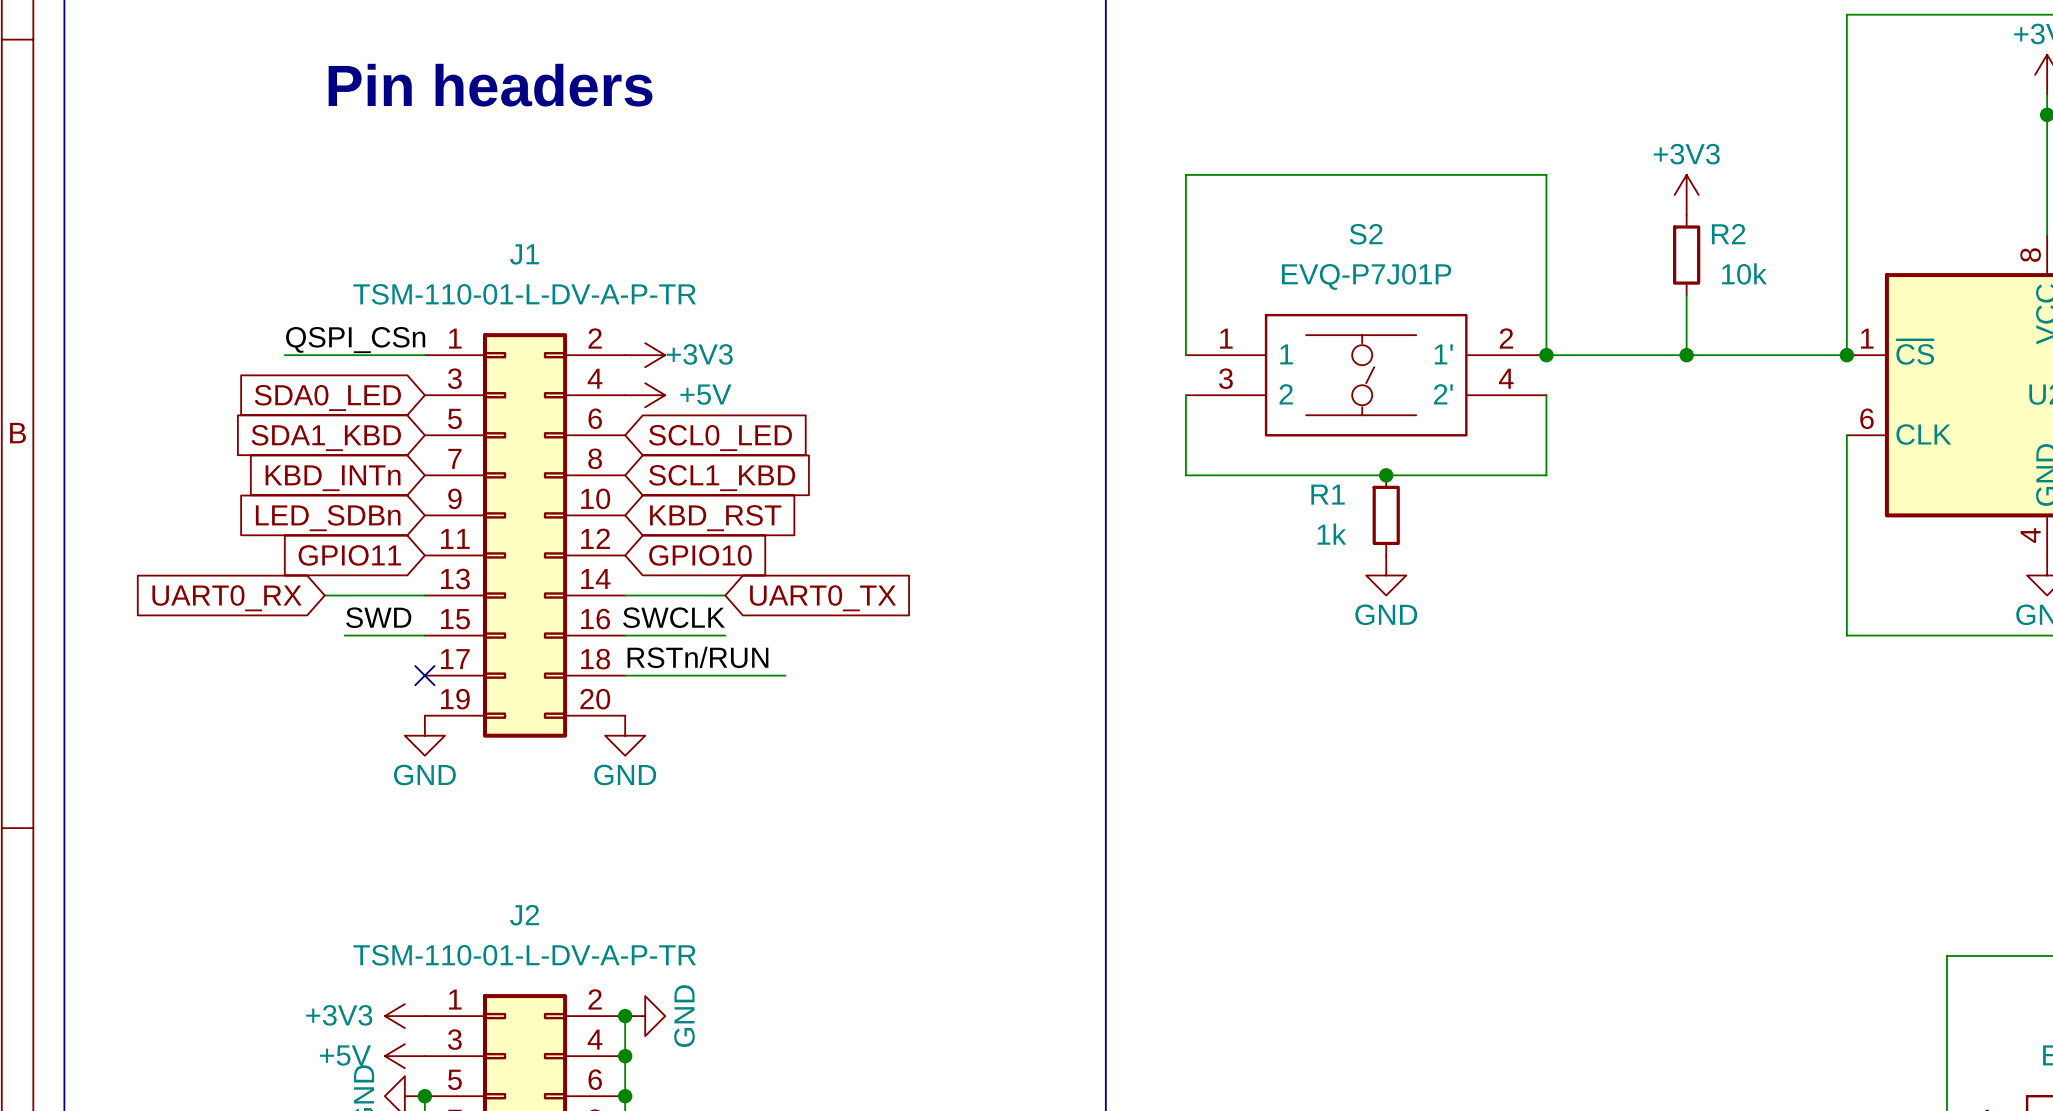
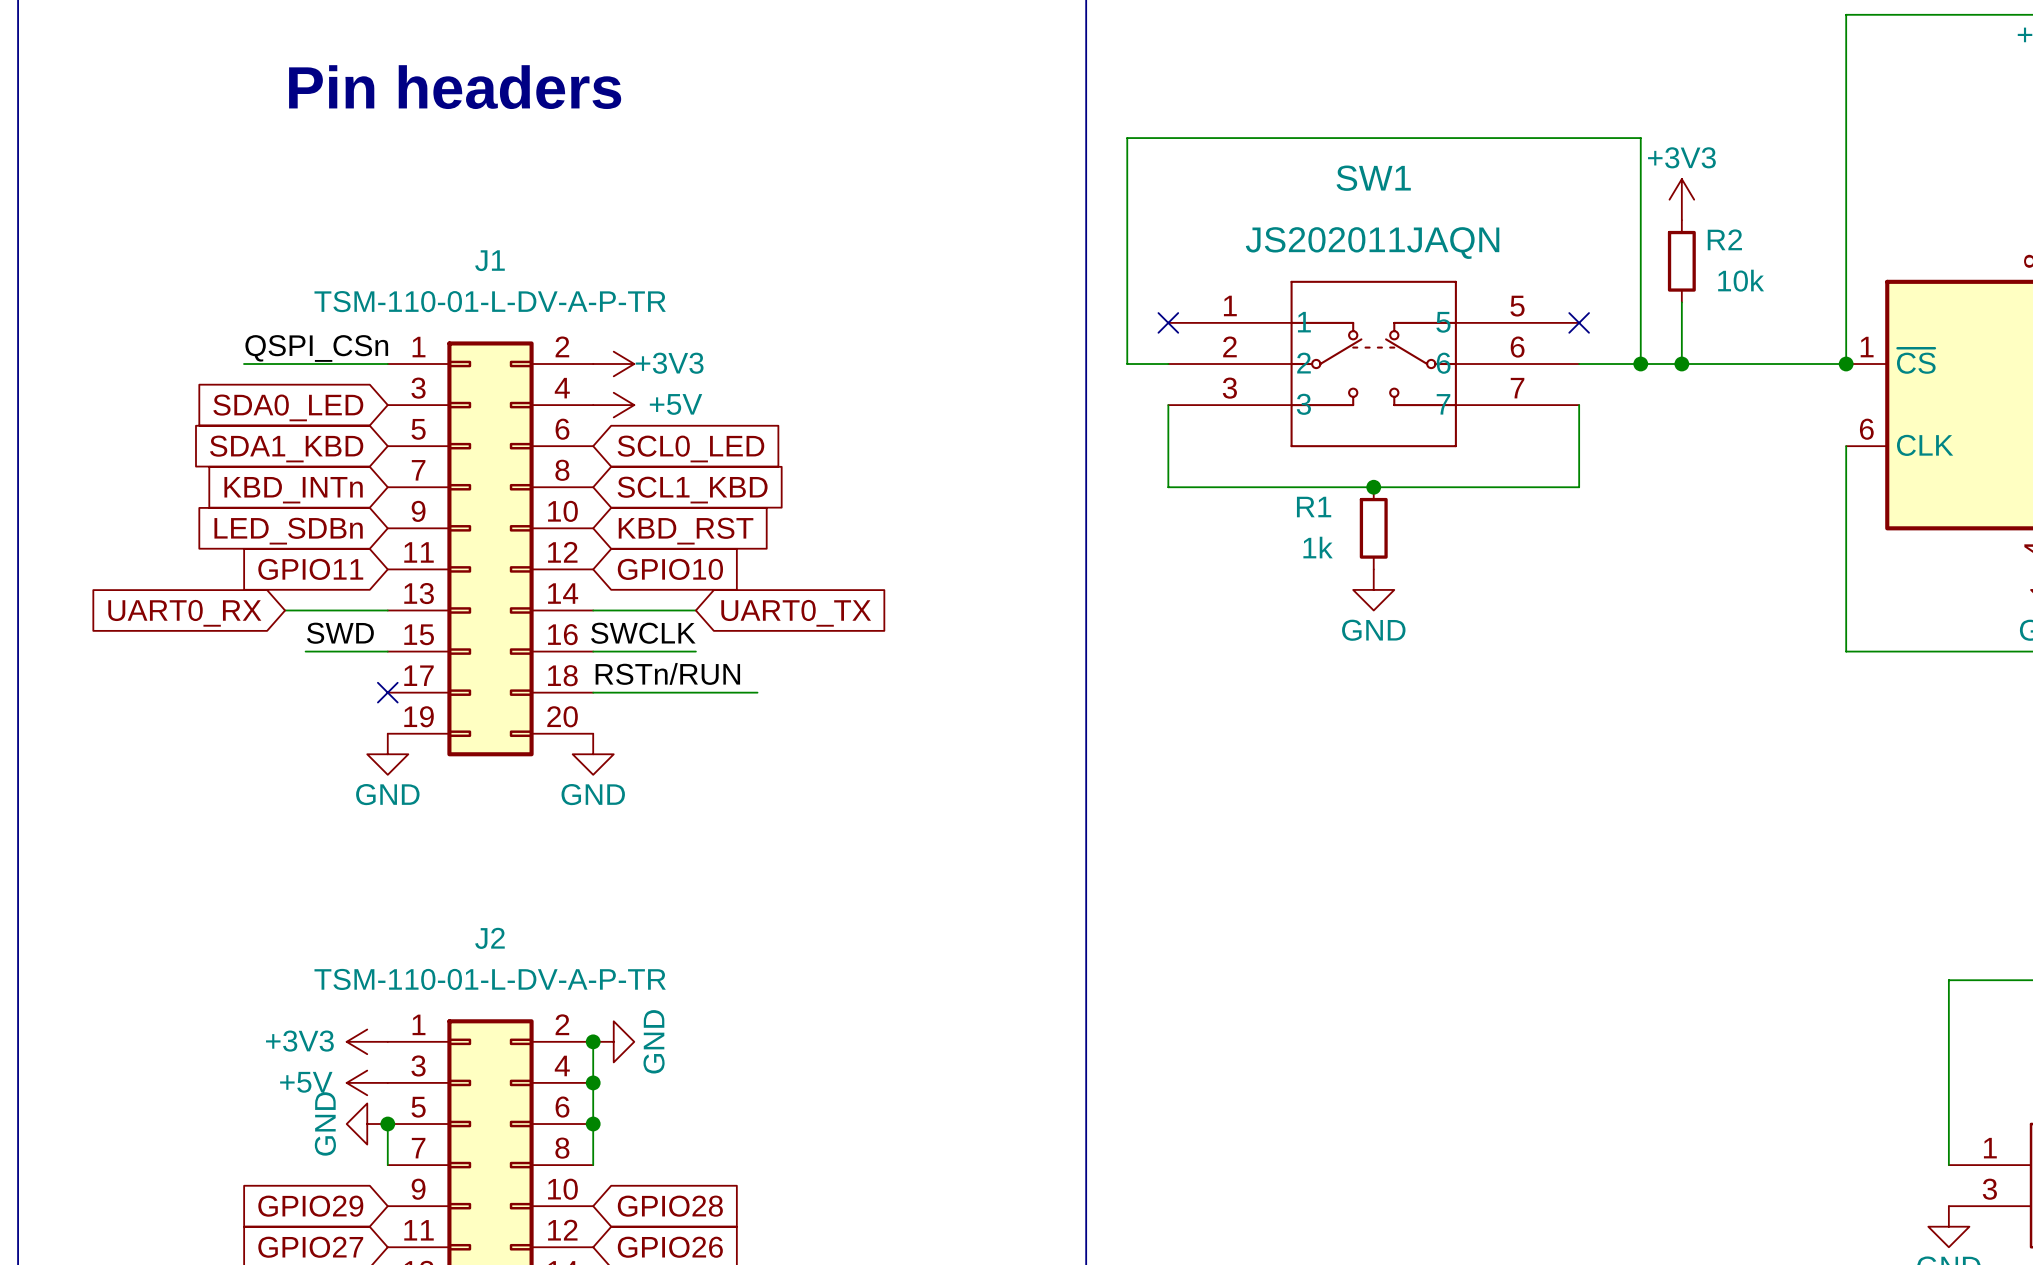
no-connect mark: none -> (1168, 322)
no-connect mark: none -> (1579, 322)
wire: (1185, 355) (1185, 174) (1546, 174) (1546, 355) (1586, 355) -> (1168, 364) (1127, 364) (1127, 138) (1640, 138) (1640, 364)
SW1: none -> JS202011JAQN (1373, 364)
junction: (1546, 355) -> none
junction: none -> (1640, 364)
S2: EVQ-P7J01P (1366, 375) -> none
wire: (1546, 395) (1546, 475) -> (1579, 405) (1579, 487) (1538, 487)

